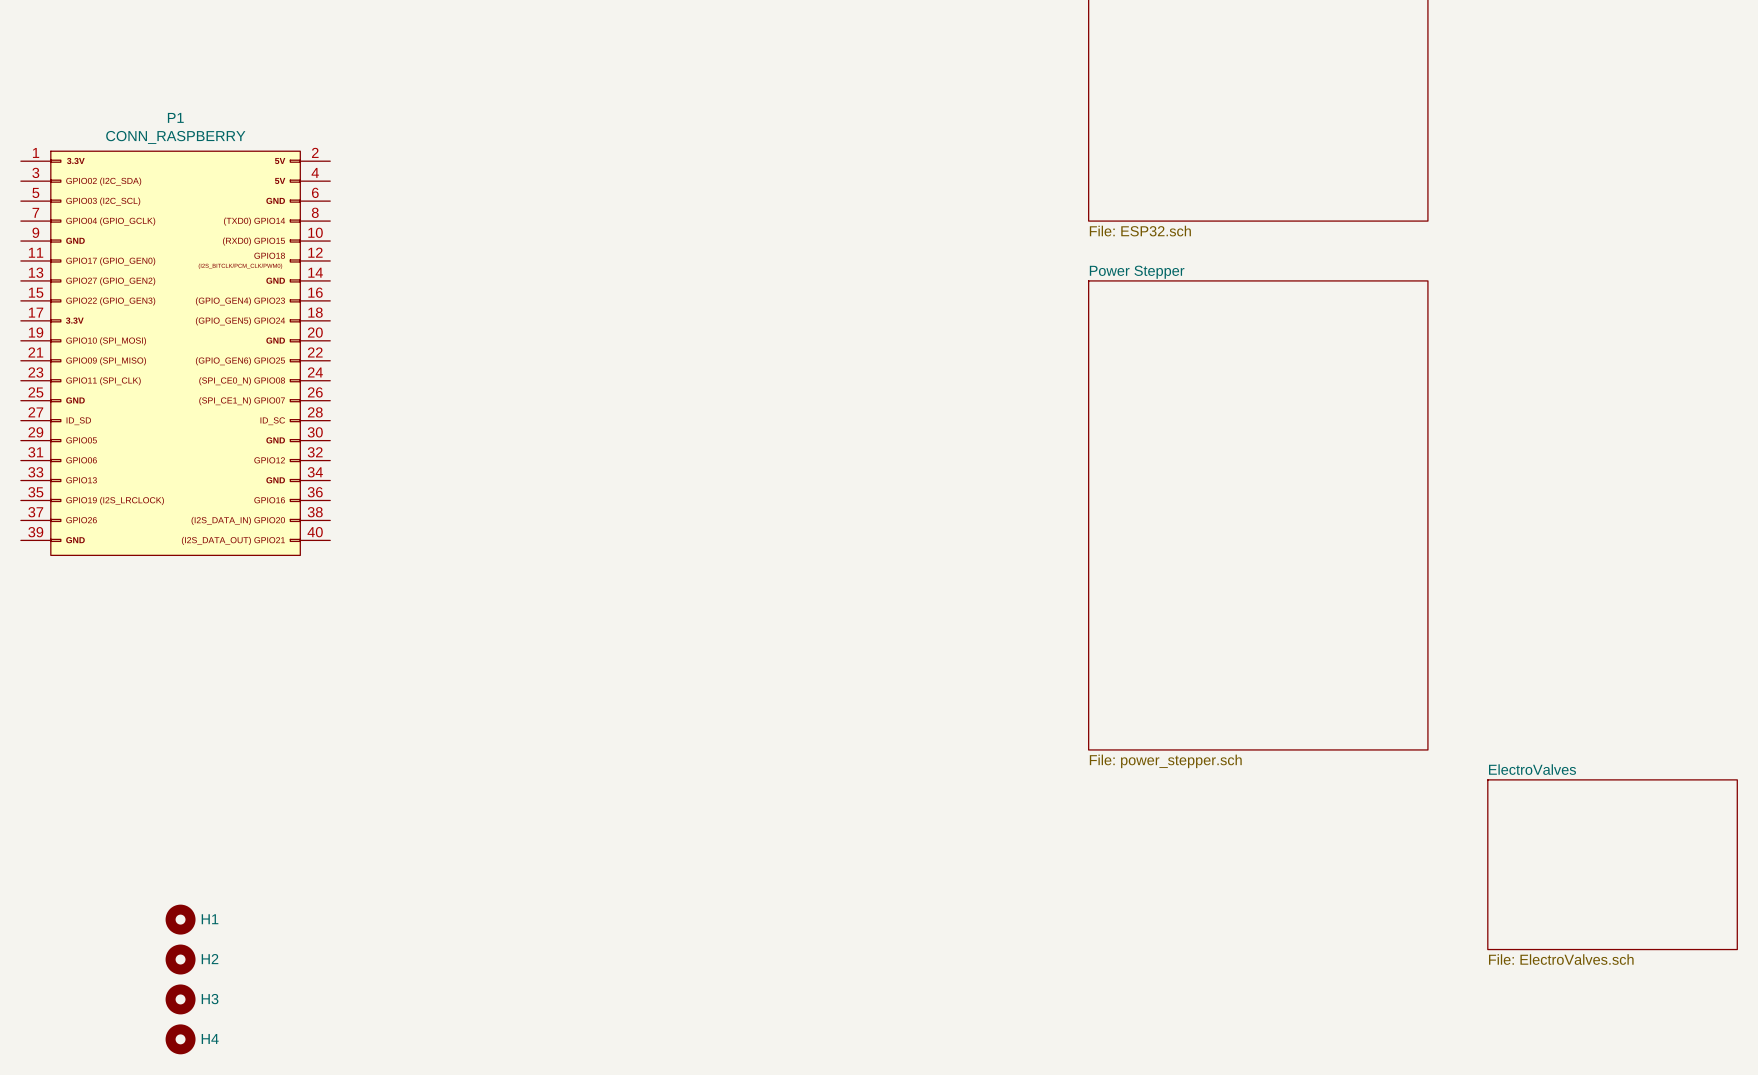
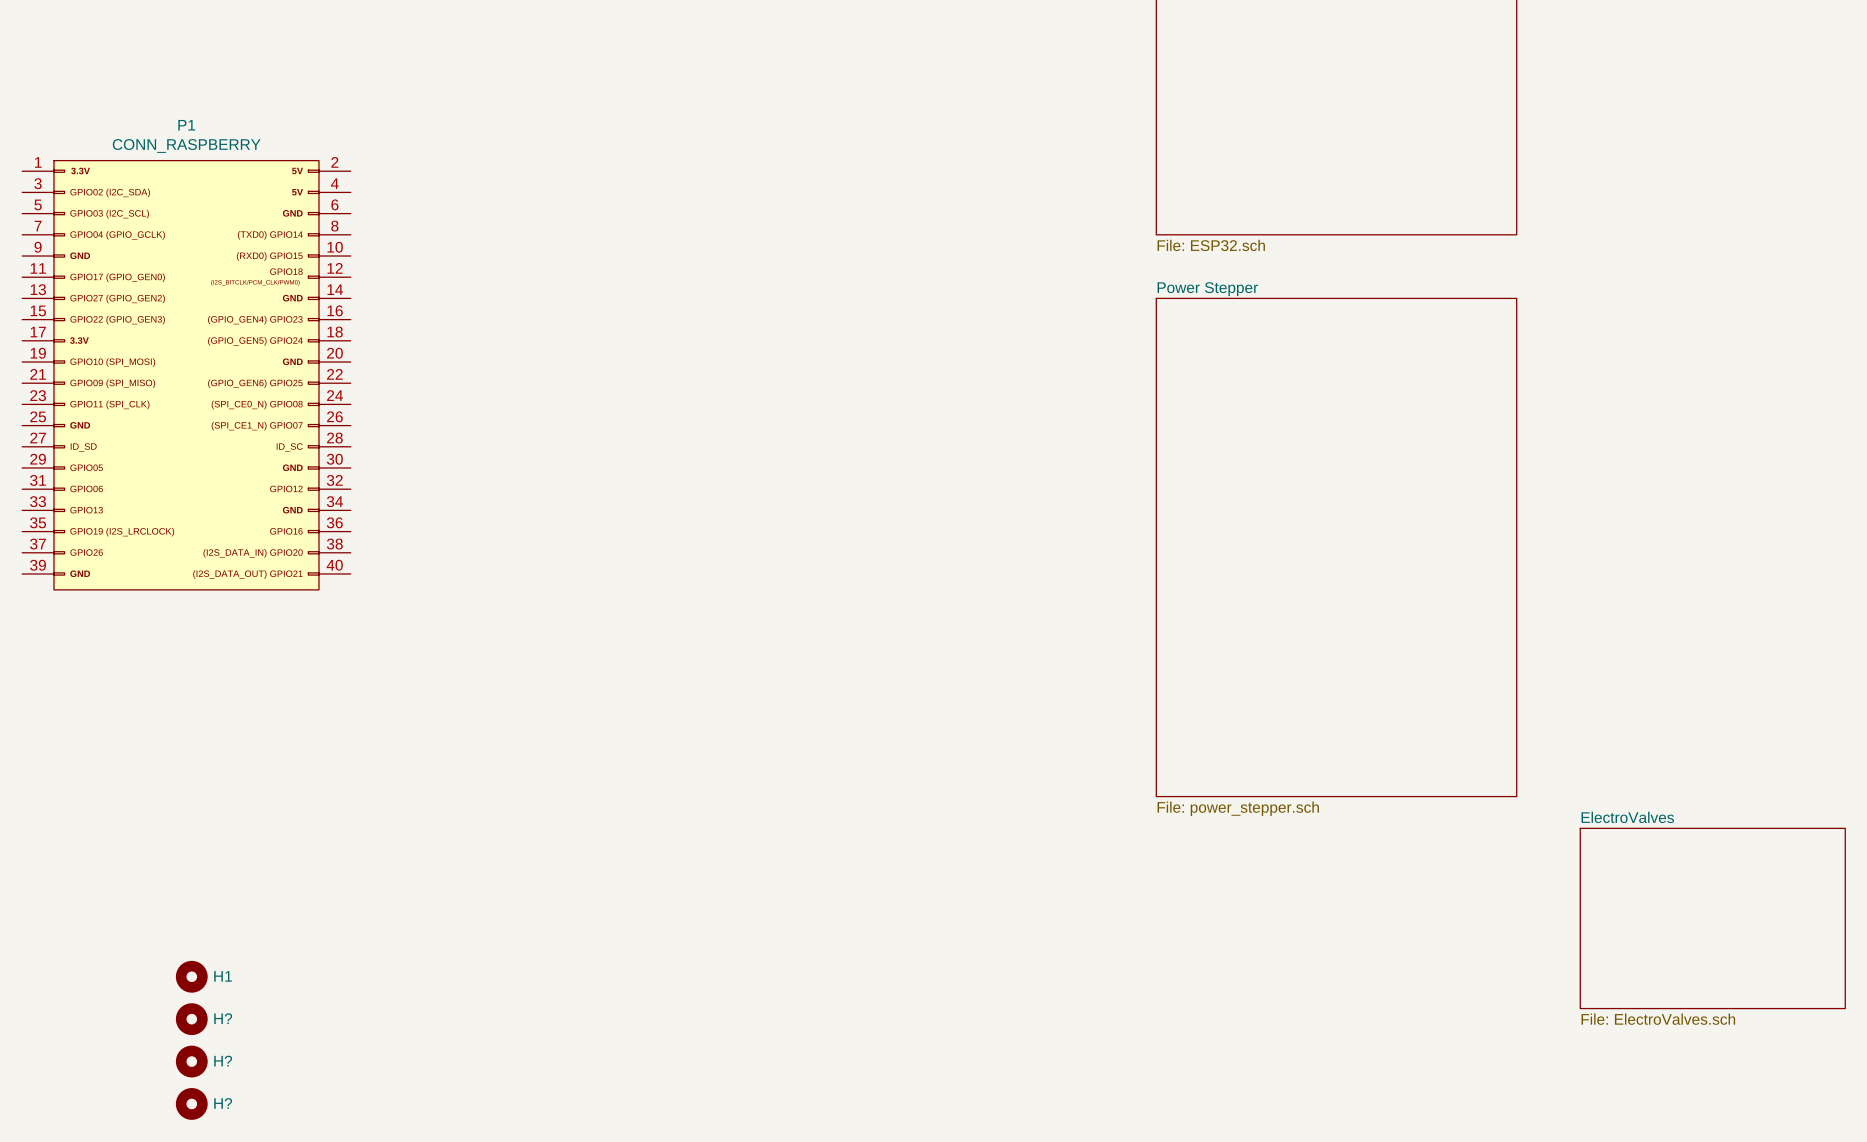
H2 name: H2 (210, 959) -> H? (223, 1018)
H3 name: H3 (210, 999) -> H? (223, 1061)
H4 name: H4 (210, 1038) -> H? (223, 1103)

